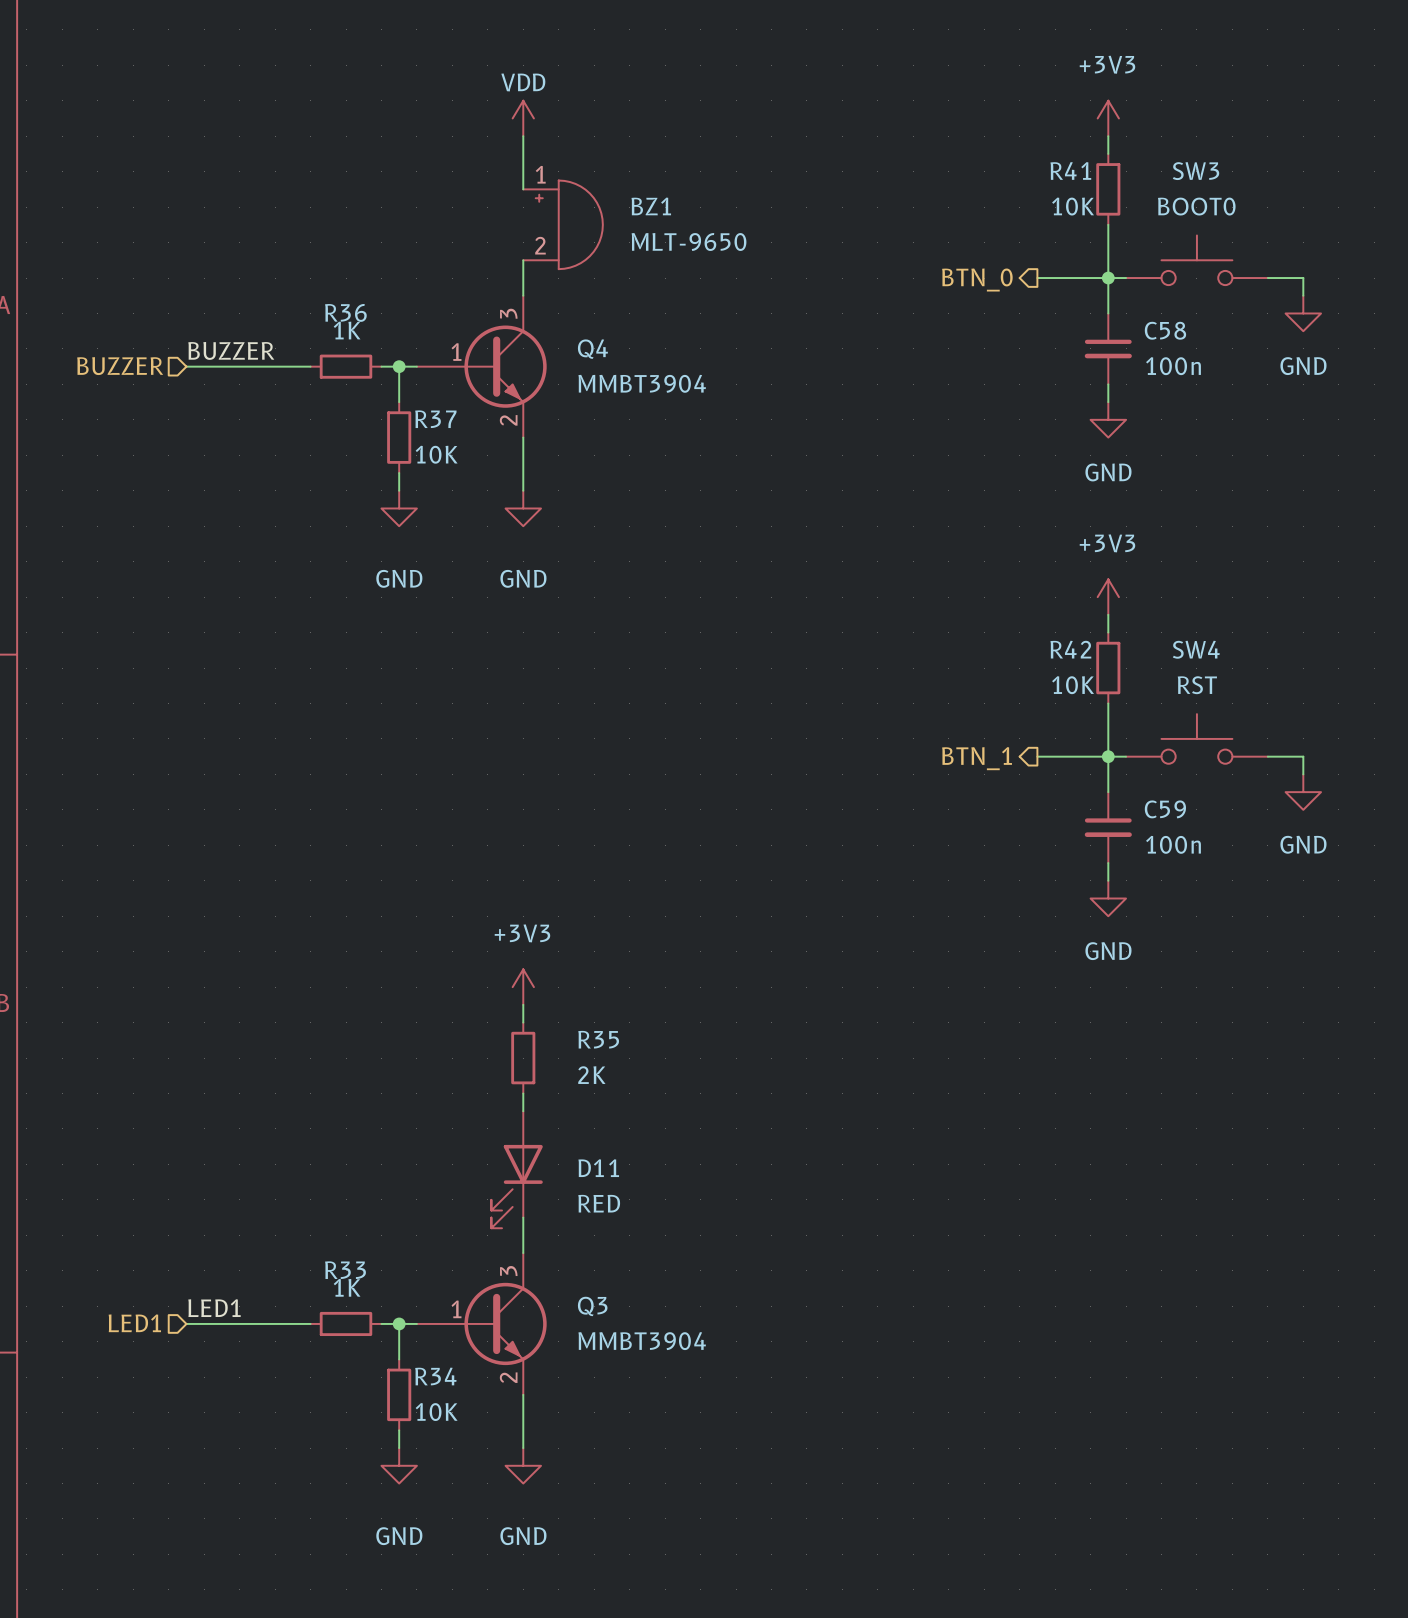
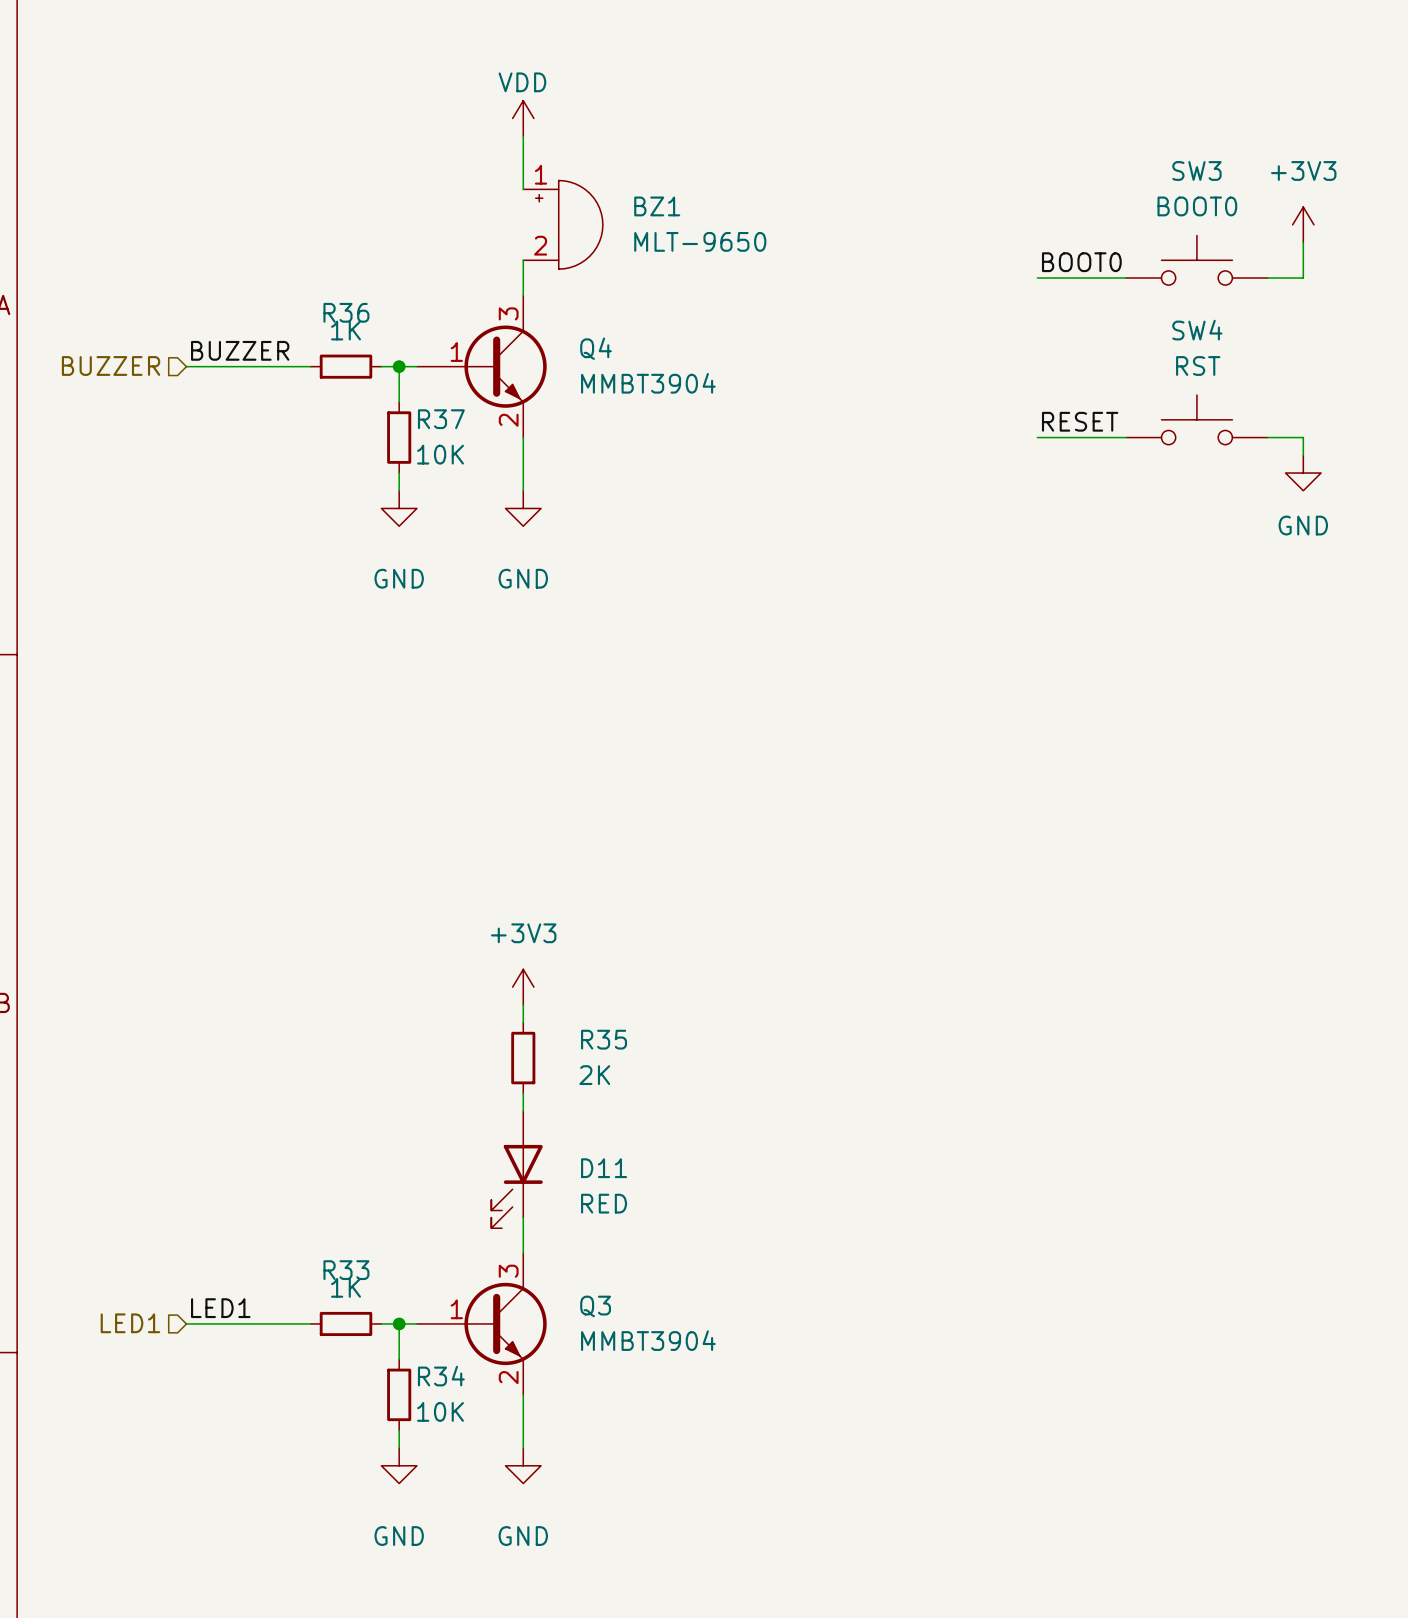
power symbol: +3V3 (1108, 118) -> none
wire: (1108, 136) (1108, 153) -> none
R41: 10K (1108, 189) -> none
wire: (1108, 224) (1108, 313) -> none
power symbol: none -> +3V3 (1303, 224)
label: none -> BOOT0 (1081, 262)
junction: (1108, 278) -> none
wire: (1303, 278) (1303, 295) -> (1303, 278) (1303, 242)
hierarchical label: BTN_0 (977, 280) -> none
power symbol: GND (1303, 313) -> none
C58: 100n (1108, 348) -> none
wire: (1108, 384) (1108, 402) -> none
power symbol: GND (1108, 419) -> none
label: none -> RESET (1080, 421)
power symbol: none -> GND (1303, 473)
power symbol: +3V3 (1108, 597) -> none
wire: (1108, 614) (1108, 632) -> none
R42: 10K (1108, 668) -> none
wire: (1108, 703) (1108, 792) -> none
SW4 position: (1196, 738) -> (1196, 419)
wire: (1037, 756) (1126, 756) -> (1037, 437) (1126, 437)
junction: (1108, 756) -> none
wire: (1267, 756) (1303, 756) (1303, 774) -> (1267, 437) (1303, 437) (1303, 455)
hierarchical label: BTN_1 (977, 758) -> none
power symbol: GND (1303, 792) -> none
C59: 100n (1108, 827) -> none
wire: (1108, 863) (1108, 880) -> none
power symbol: GND (1108, 898) -> none

